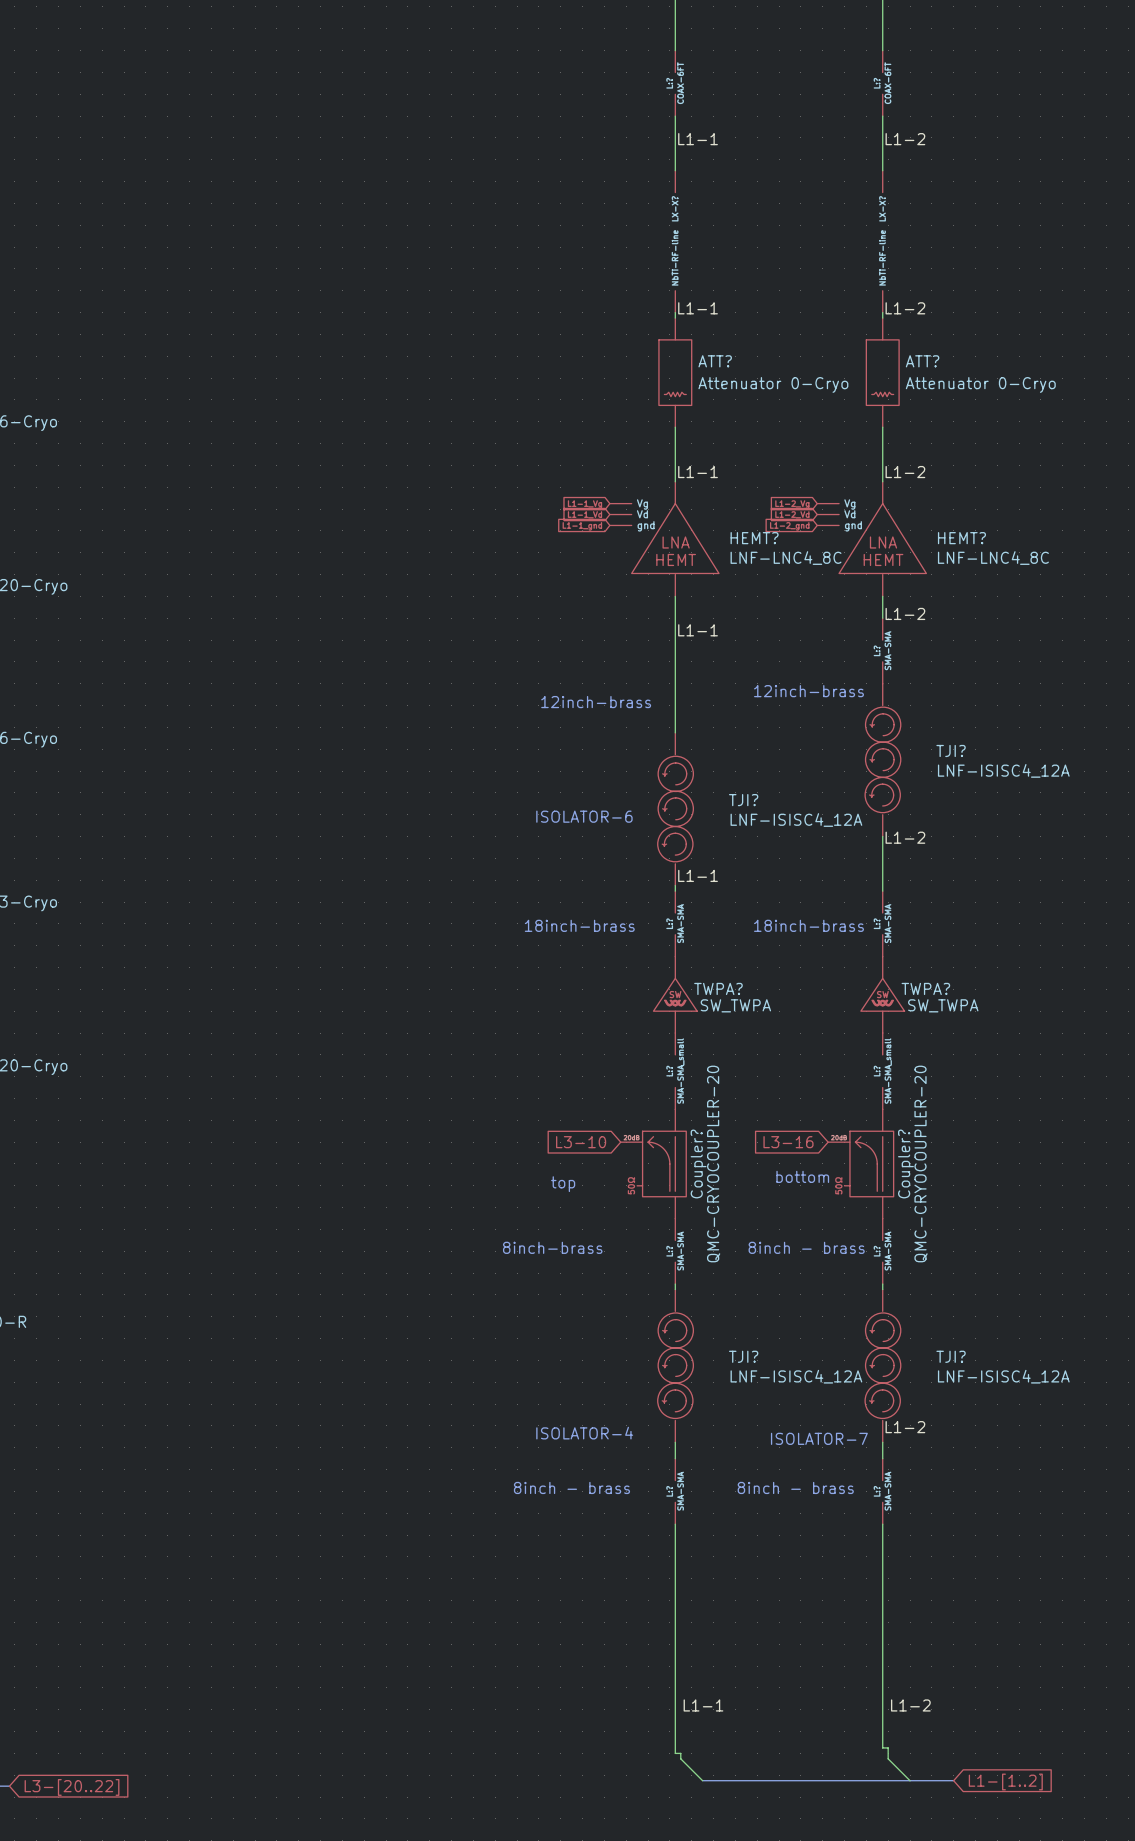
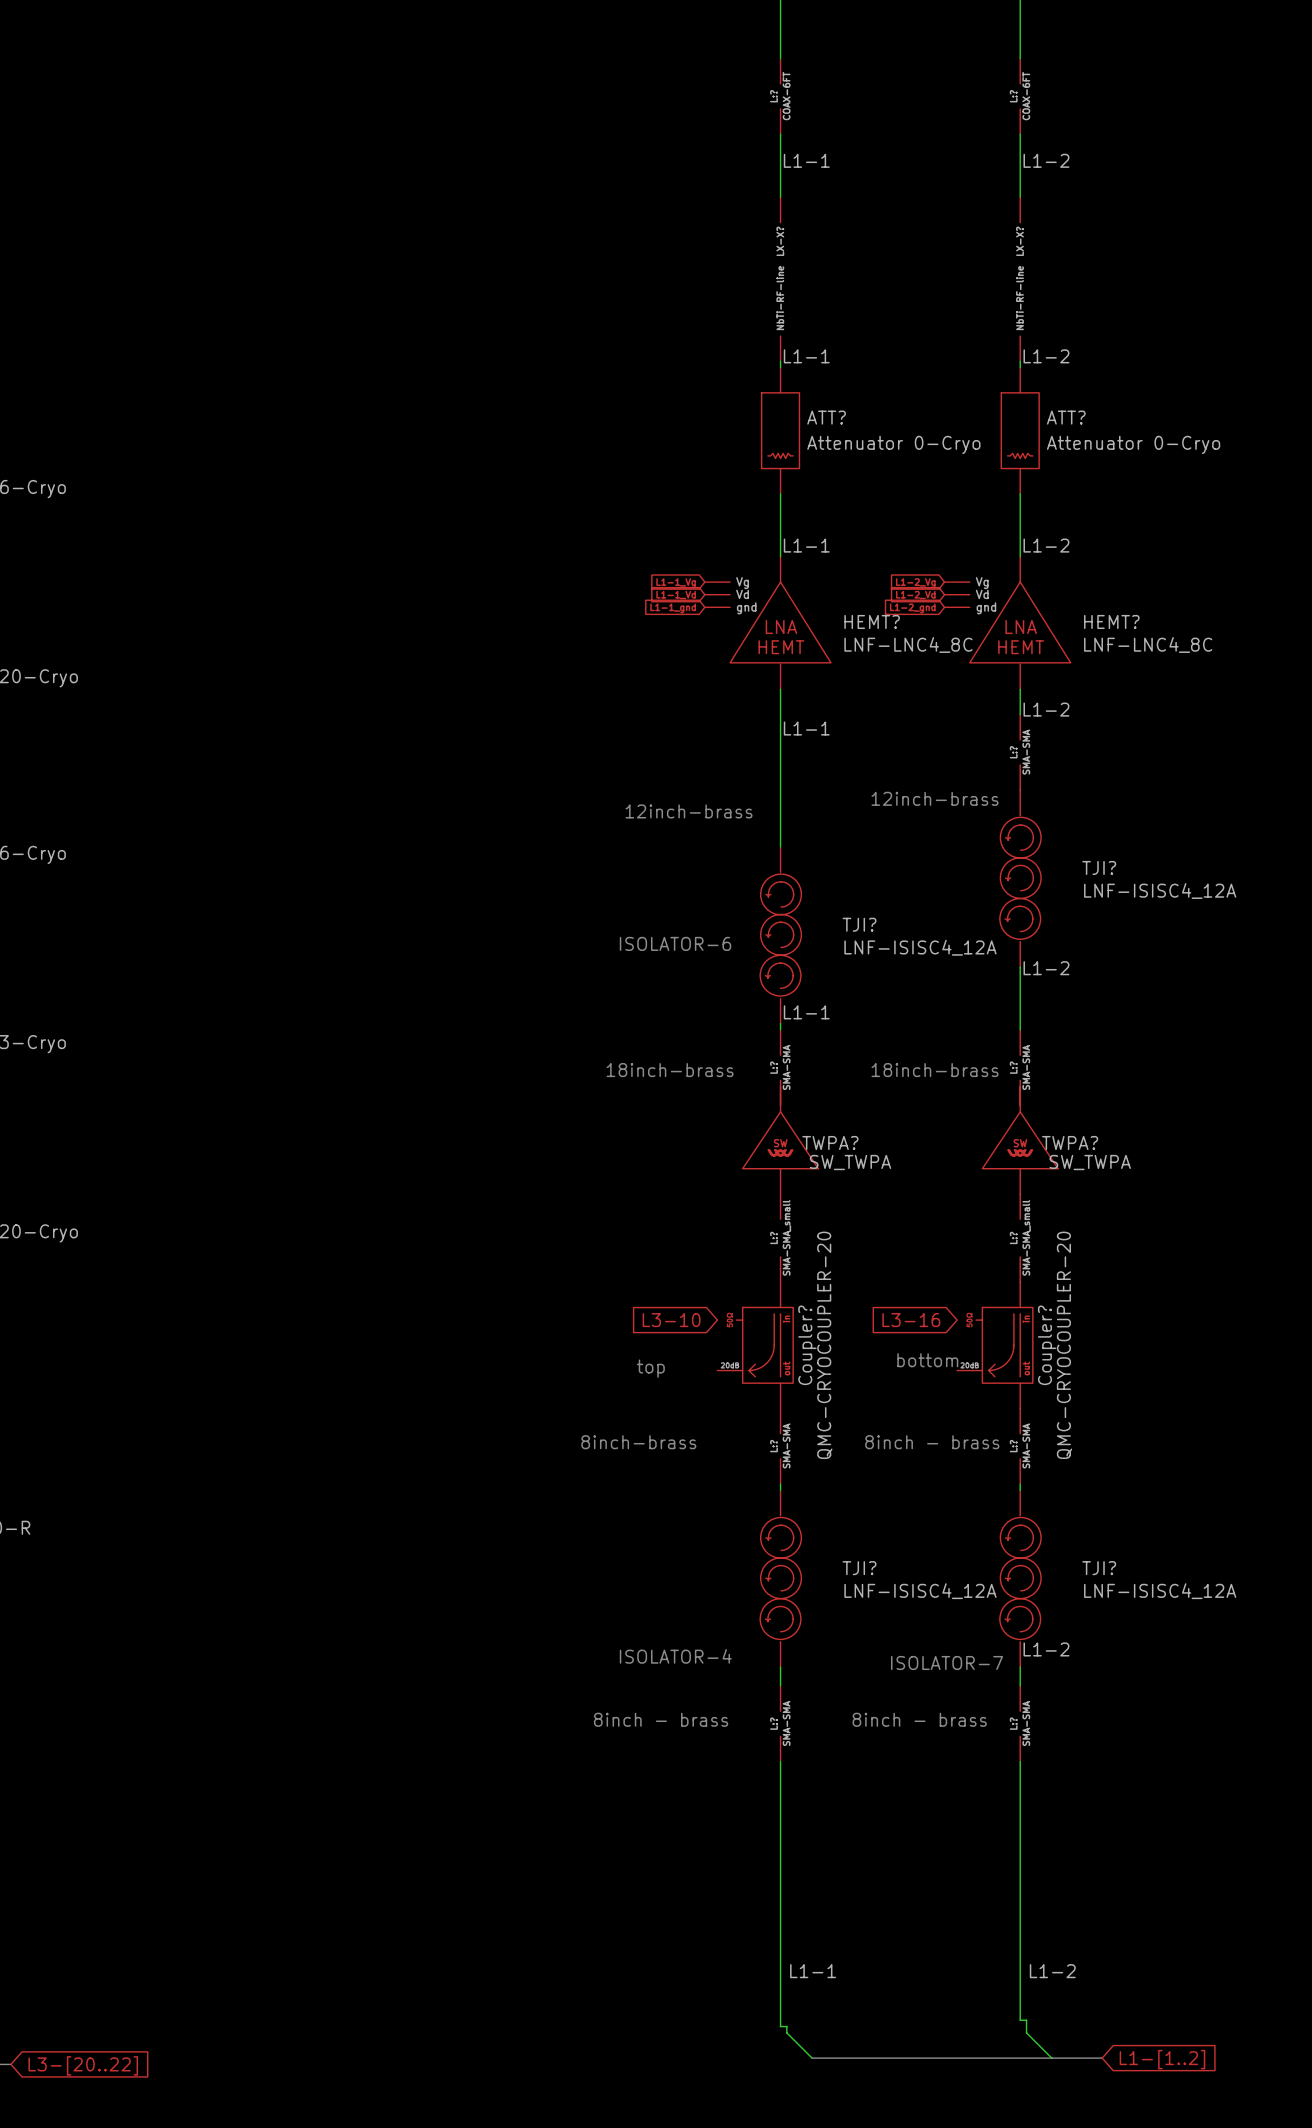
TWPA? symbol: [653, 956, 698, 1034] -> [742, 1086, 819, 1194]
TWPA? symbol: [860, 956, 905, 1034] -> [982, 1086, 1059, 1194]
Coupler? symbol: [620, 1109, 687, 1219] -> [717, 1282, 794, 1409]
Coupler? symbol: [828, 1109, 894, 1219] -> [957, 1282, 1033, 1409]

